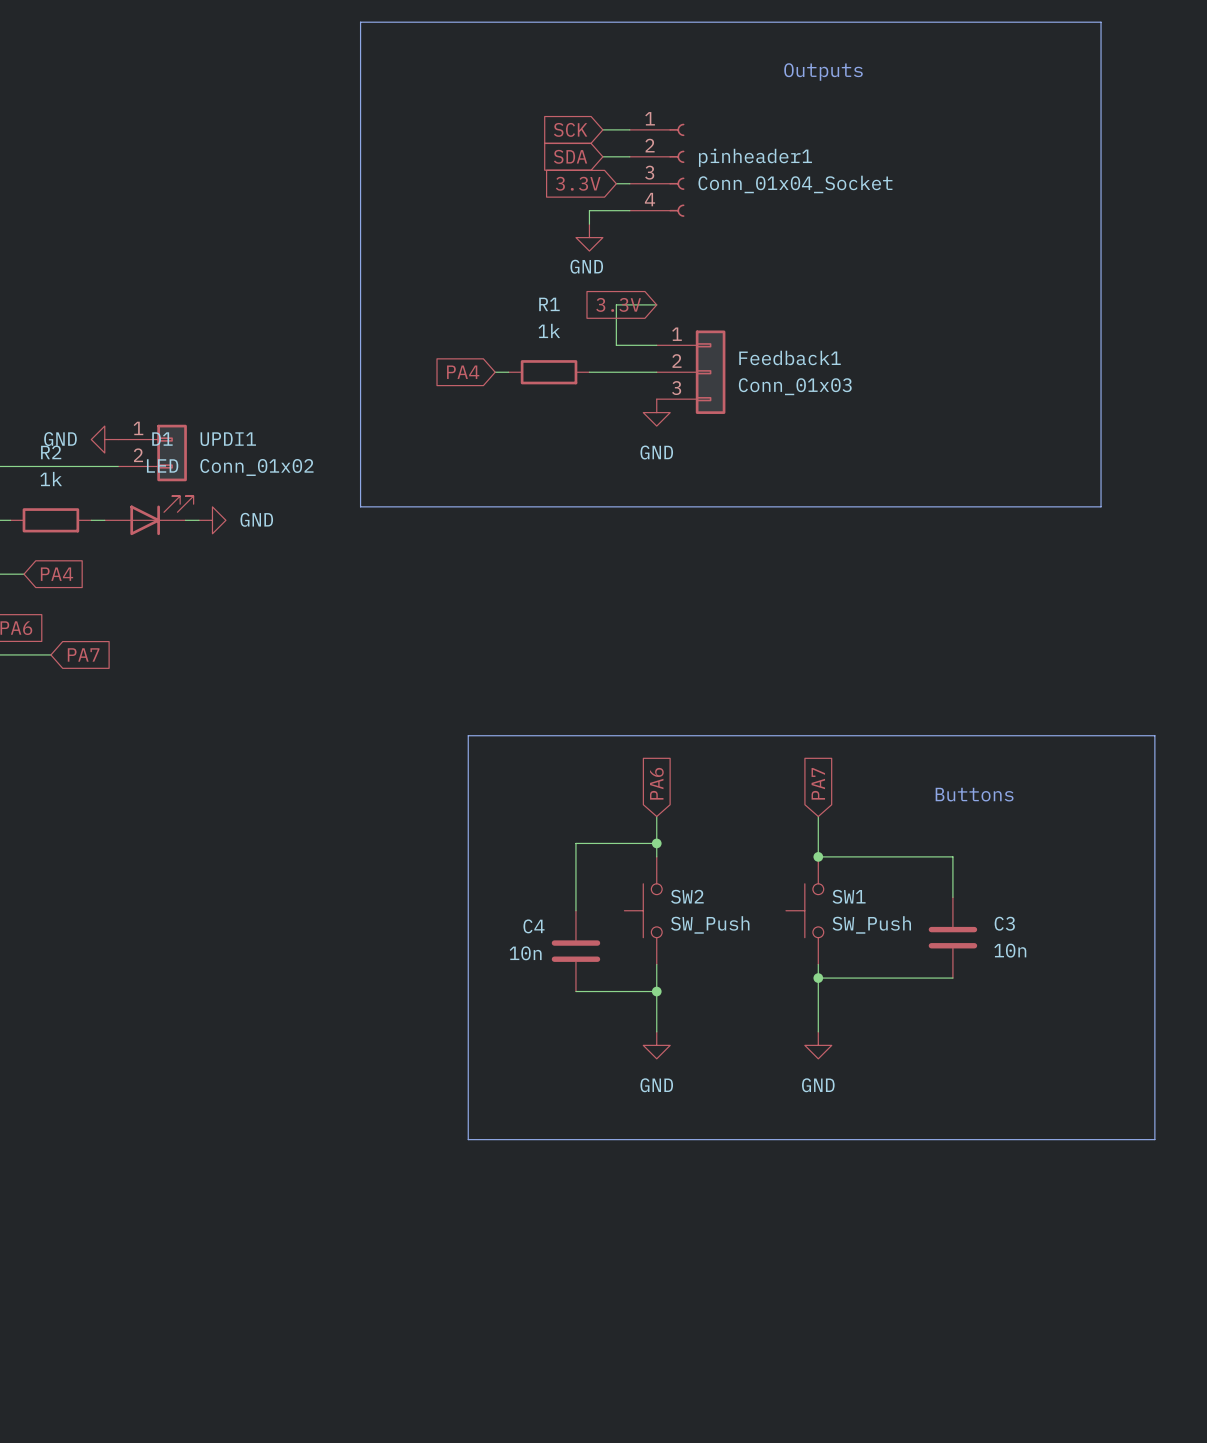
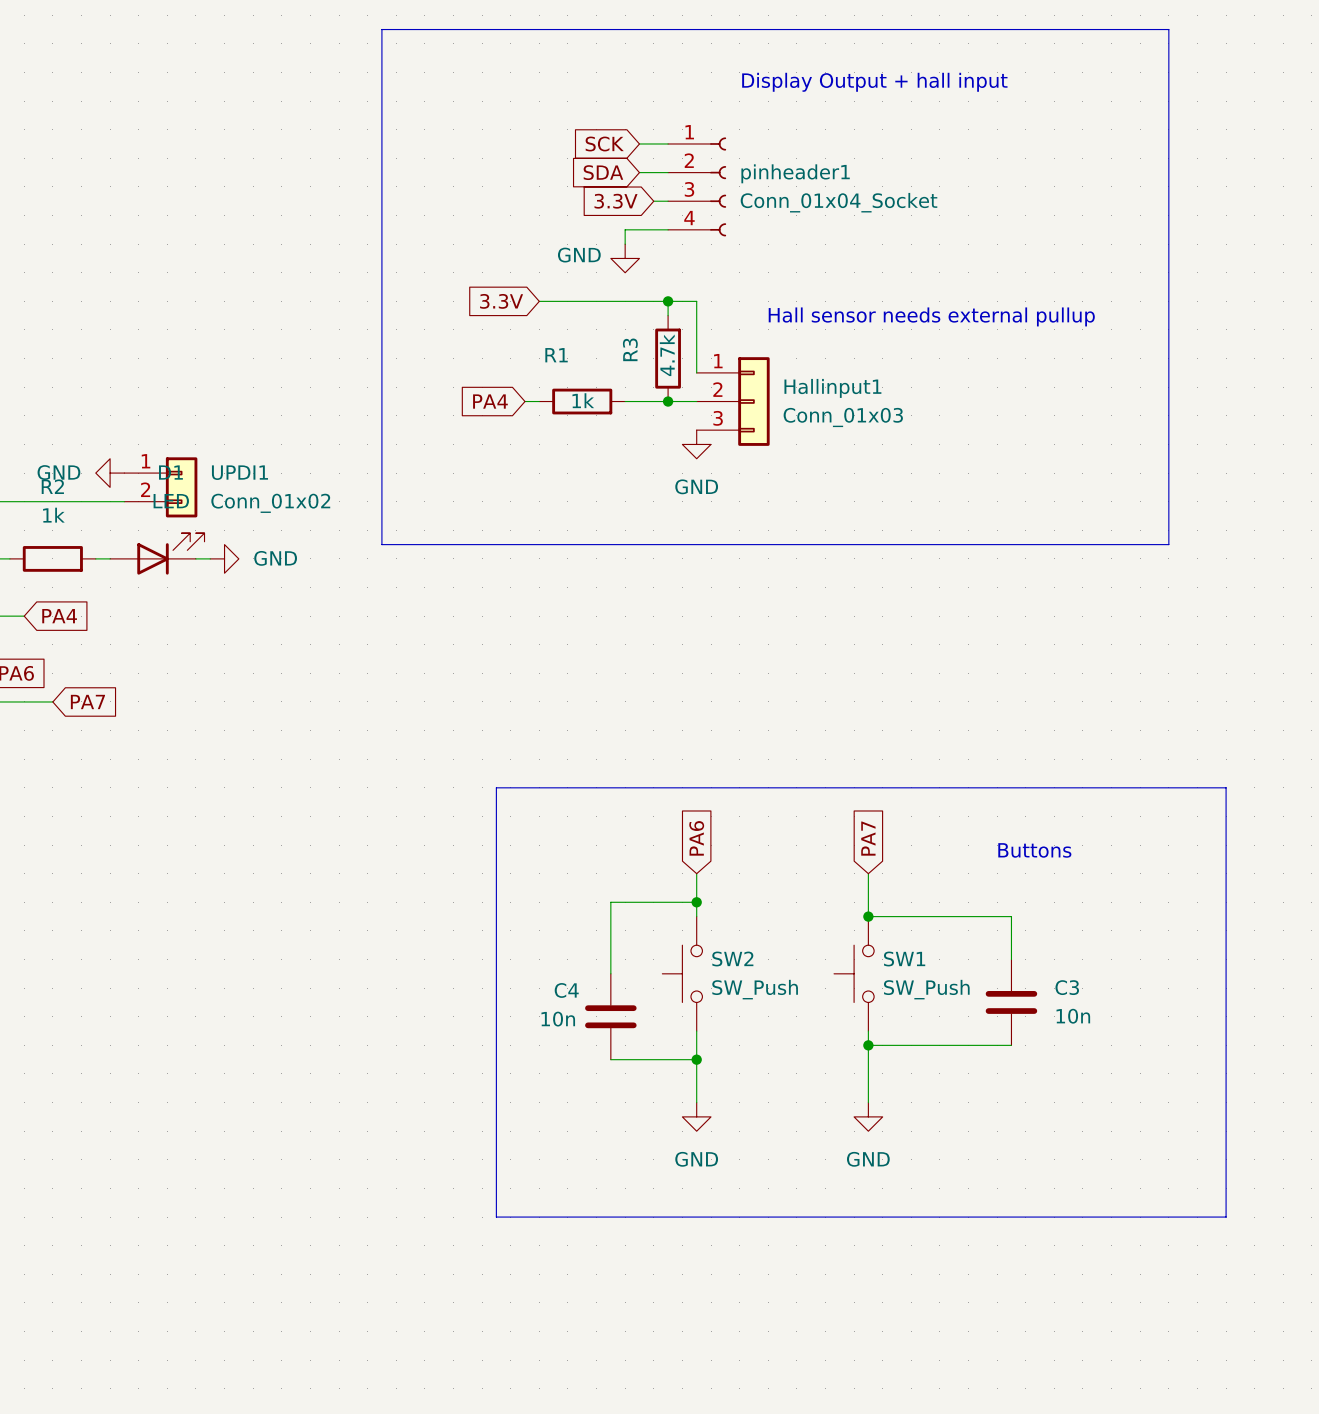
text: Outputs (823, 72) -> Display Output + hall input (874, 82)
power symbol text position: GND (586, 266) -> GND (579, 255)
wire: none -> (668, 301) (668, 315)
junction: none -> (668, 301)
text: none -> Hall sensor needs external pullup (931, 316)
R1 name position: R1 (549, 304) -> R1 (556, 355)
global label position: 3.3V (618, 304) -> 3.3V (501, 301)
wire: (656, 304) (616, 304) (616, 345) (656, 345) -> (539, 301) (696, 301) (696, 372)
R1 value position: 1k (549, 330) -> 1k (583, 400)
R3: none -> 4.7k (668, 358)
Feedback1 name: Feedback1 (790, 357) -> Hallinput1 (832, 388)
junction: none -> (668, 401)

